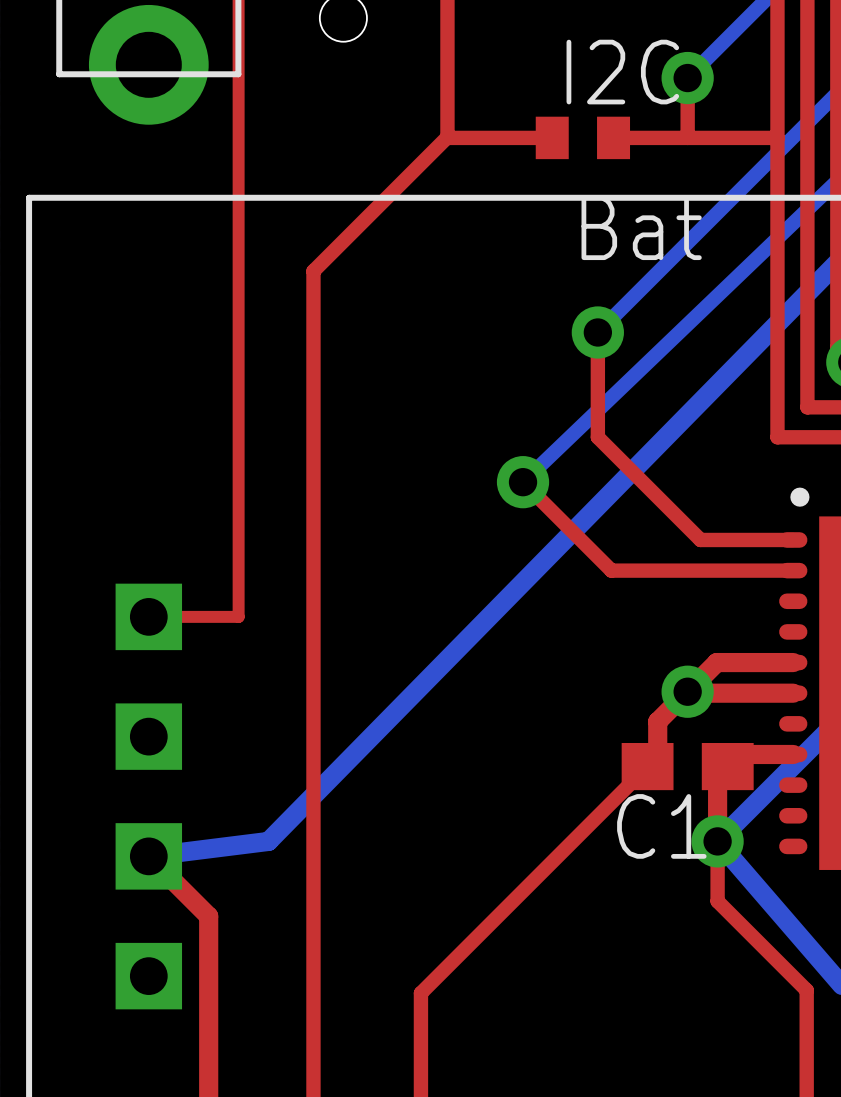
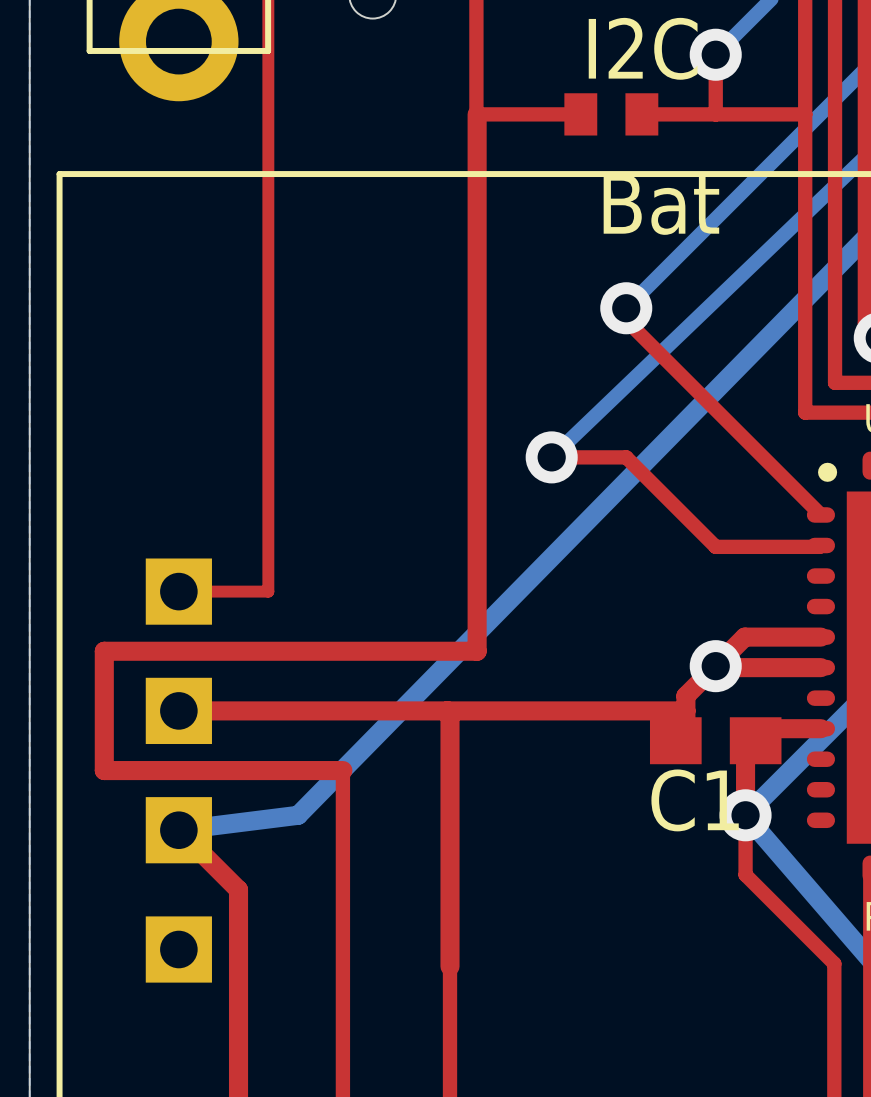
top track: (447, 137) (313, 271) (313, 796) -> (477, 114) (477, 651) (104, 651) (104, 770) (342, 770)
top track: (597, 344) (597, 437) (700, 539) (793, 539) -> (626, 320) (820, 514)
top track: (523, 482) (611, 570) (793, 570) -> (551, 457) (626, 457) (715, 546) (820, 545)
top track: none -> (178, 710) (685, 710)
top track: (647, 766) (420, 993) -> (447, 710) (450, 713) (450, 966)

